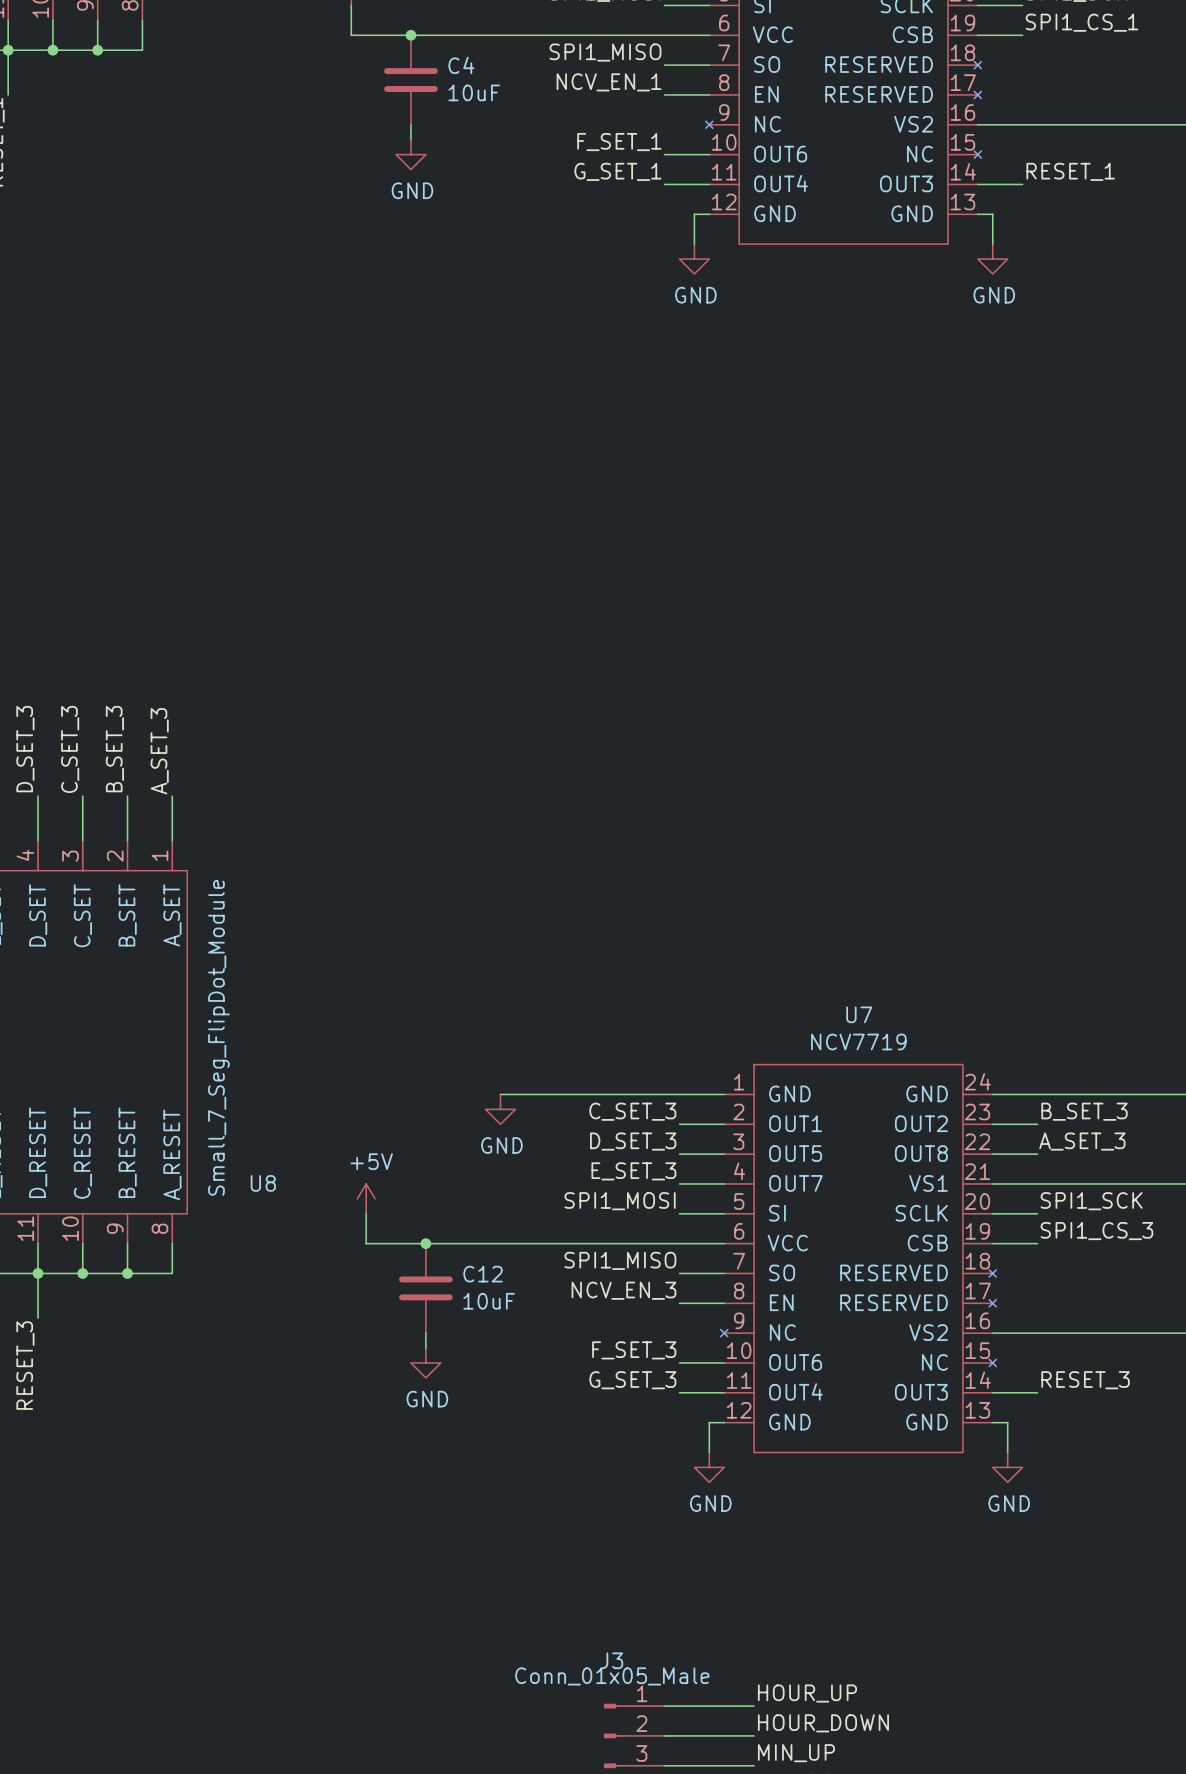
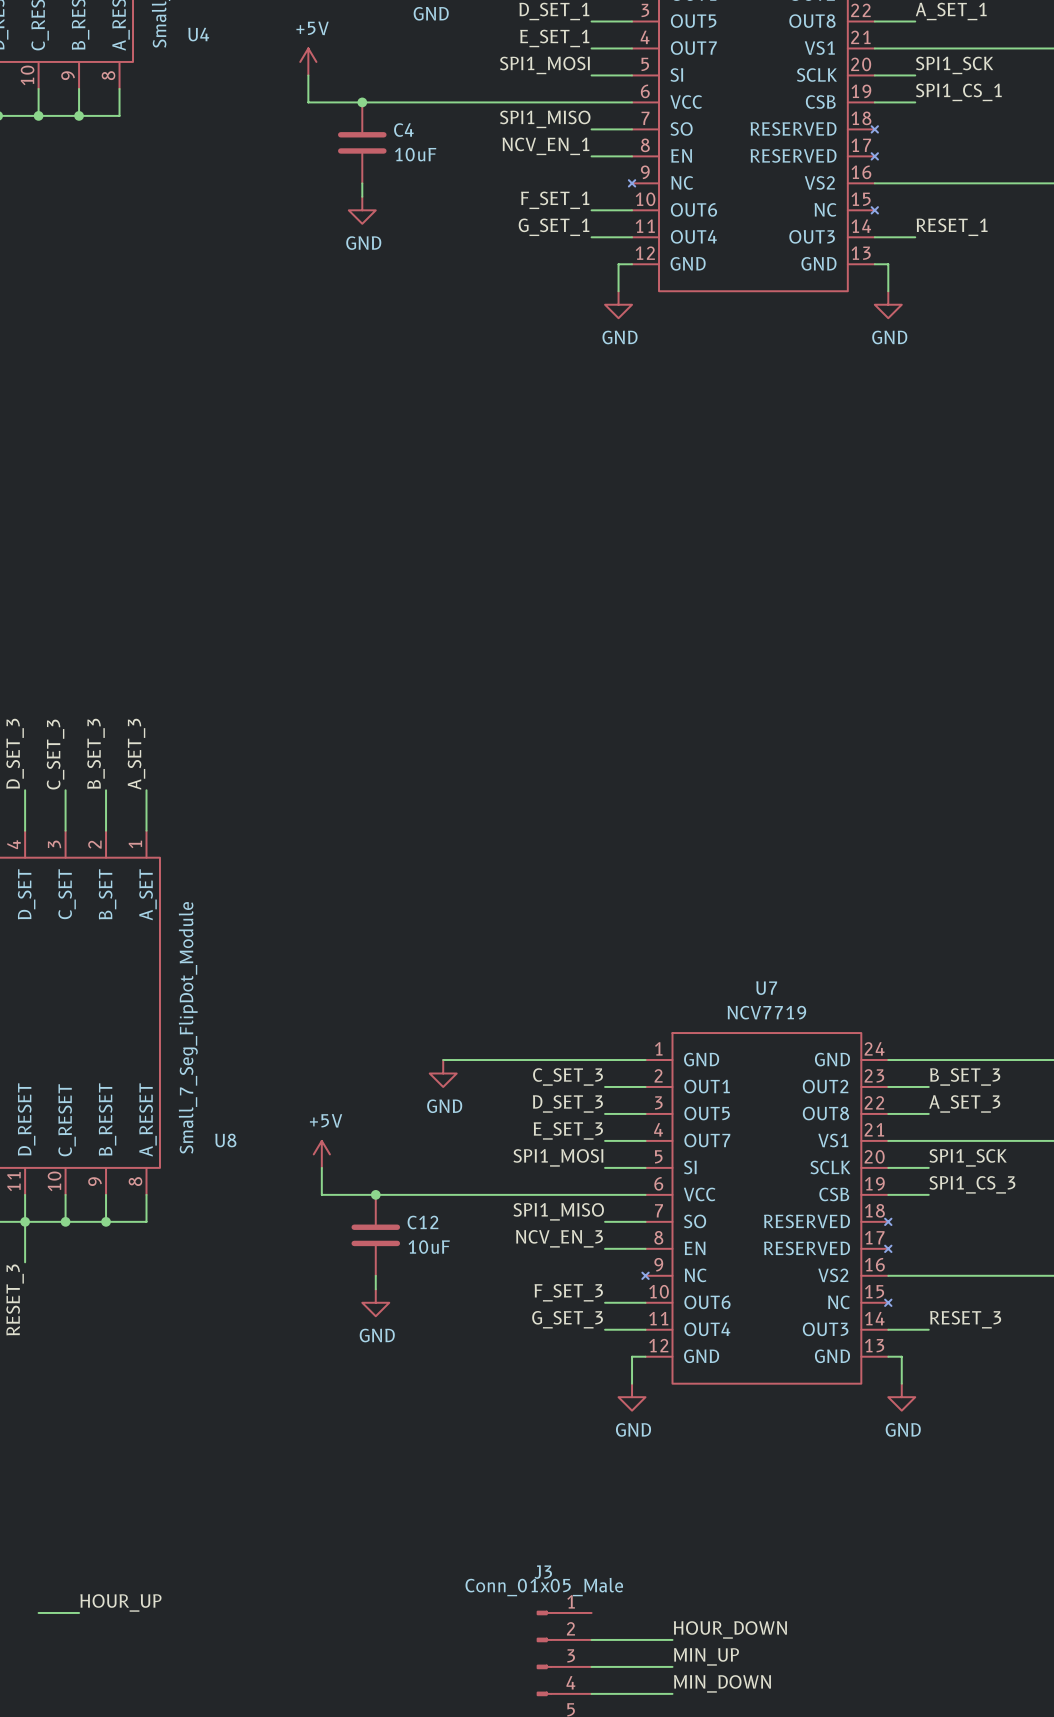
label: none -> HOUR_UP (120, 1602)
label: HOUR_UP (807, 1693) -> none
wire: none -> (38, 1612) (79, 1612)
wire: (664, 1706) (754, 1706) -> none

